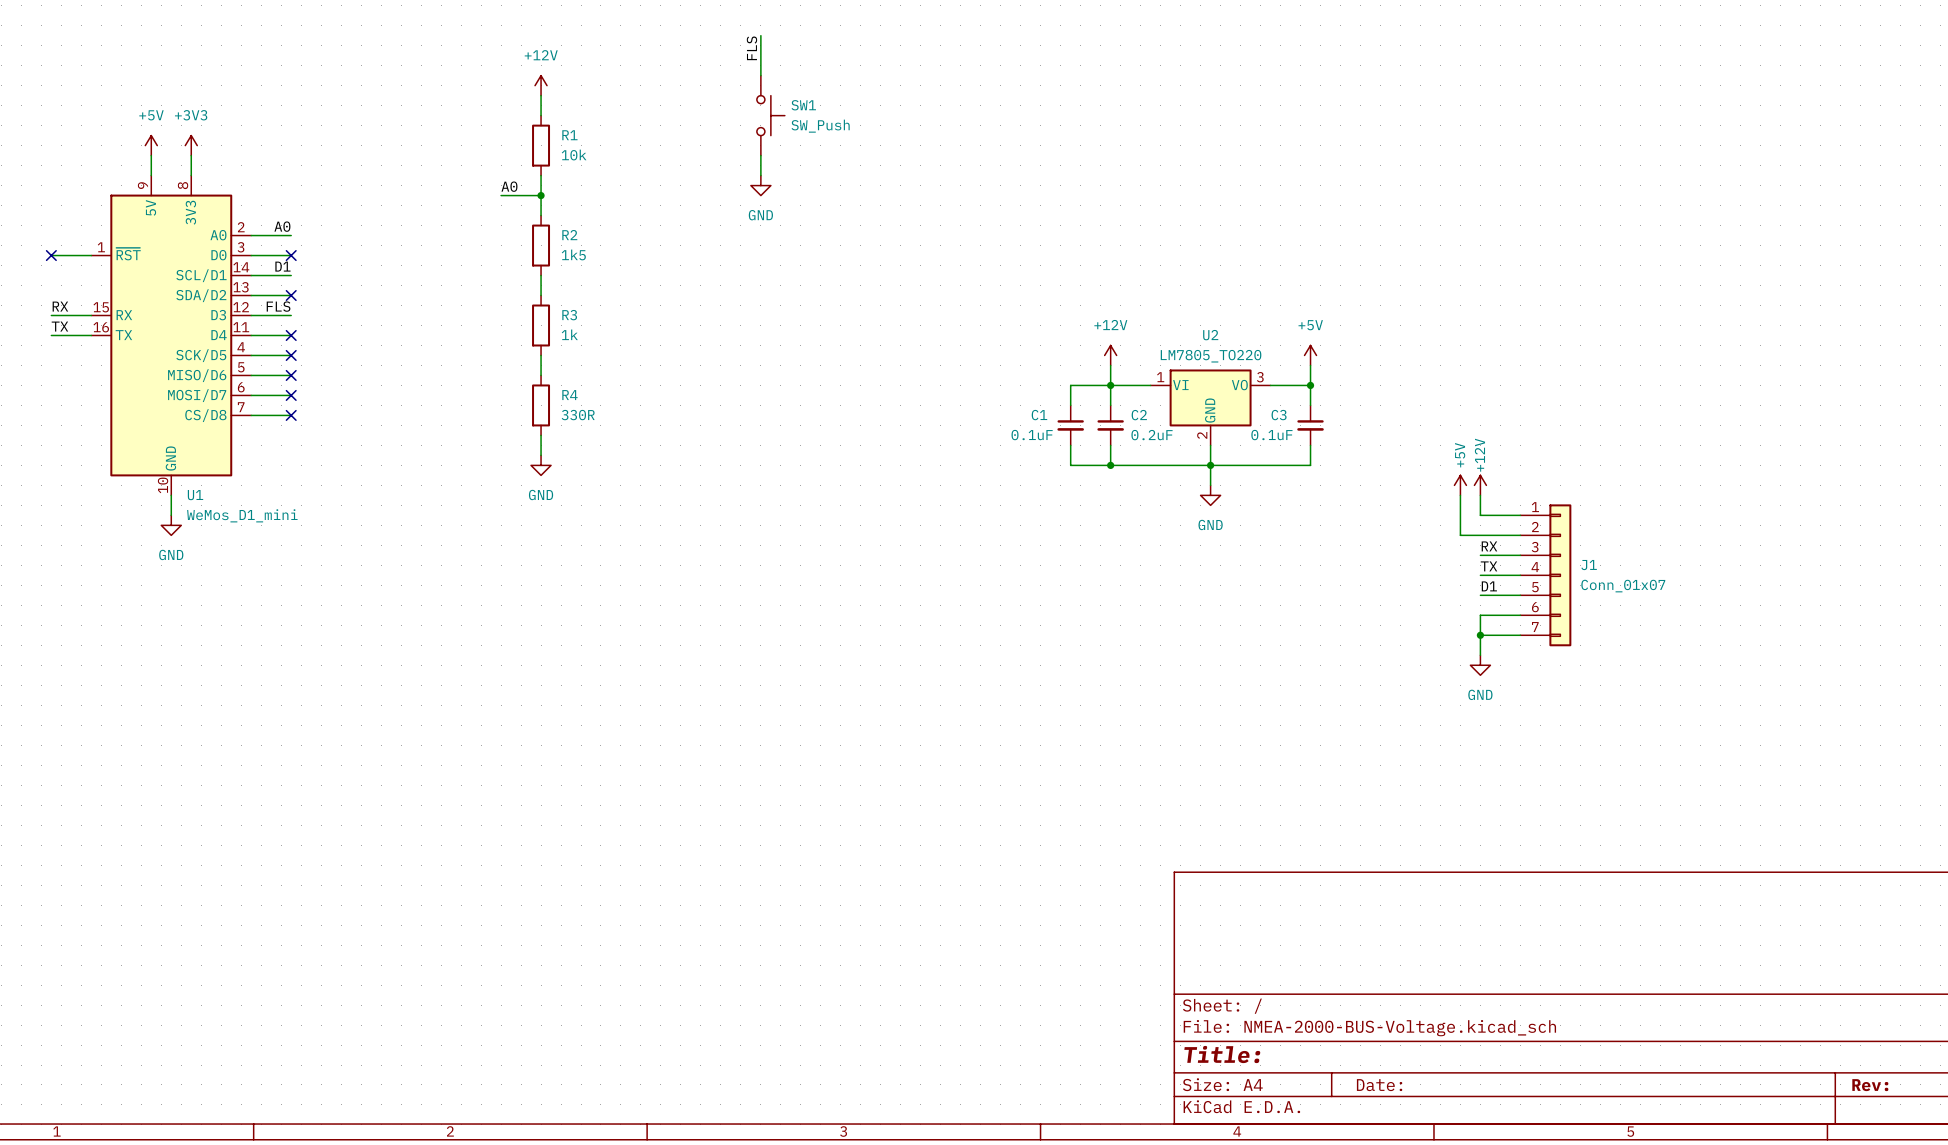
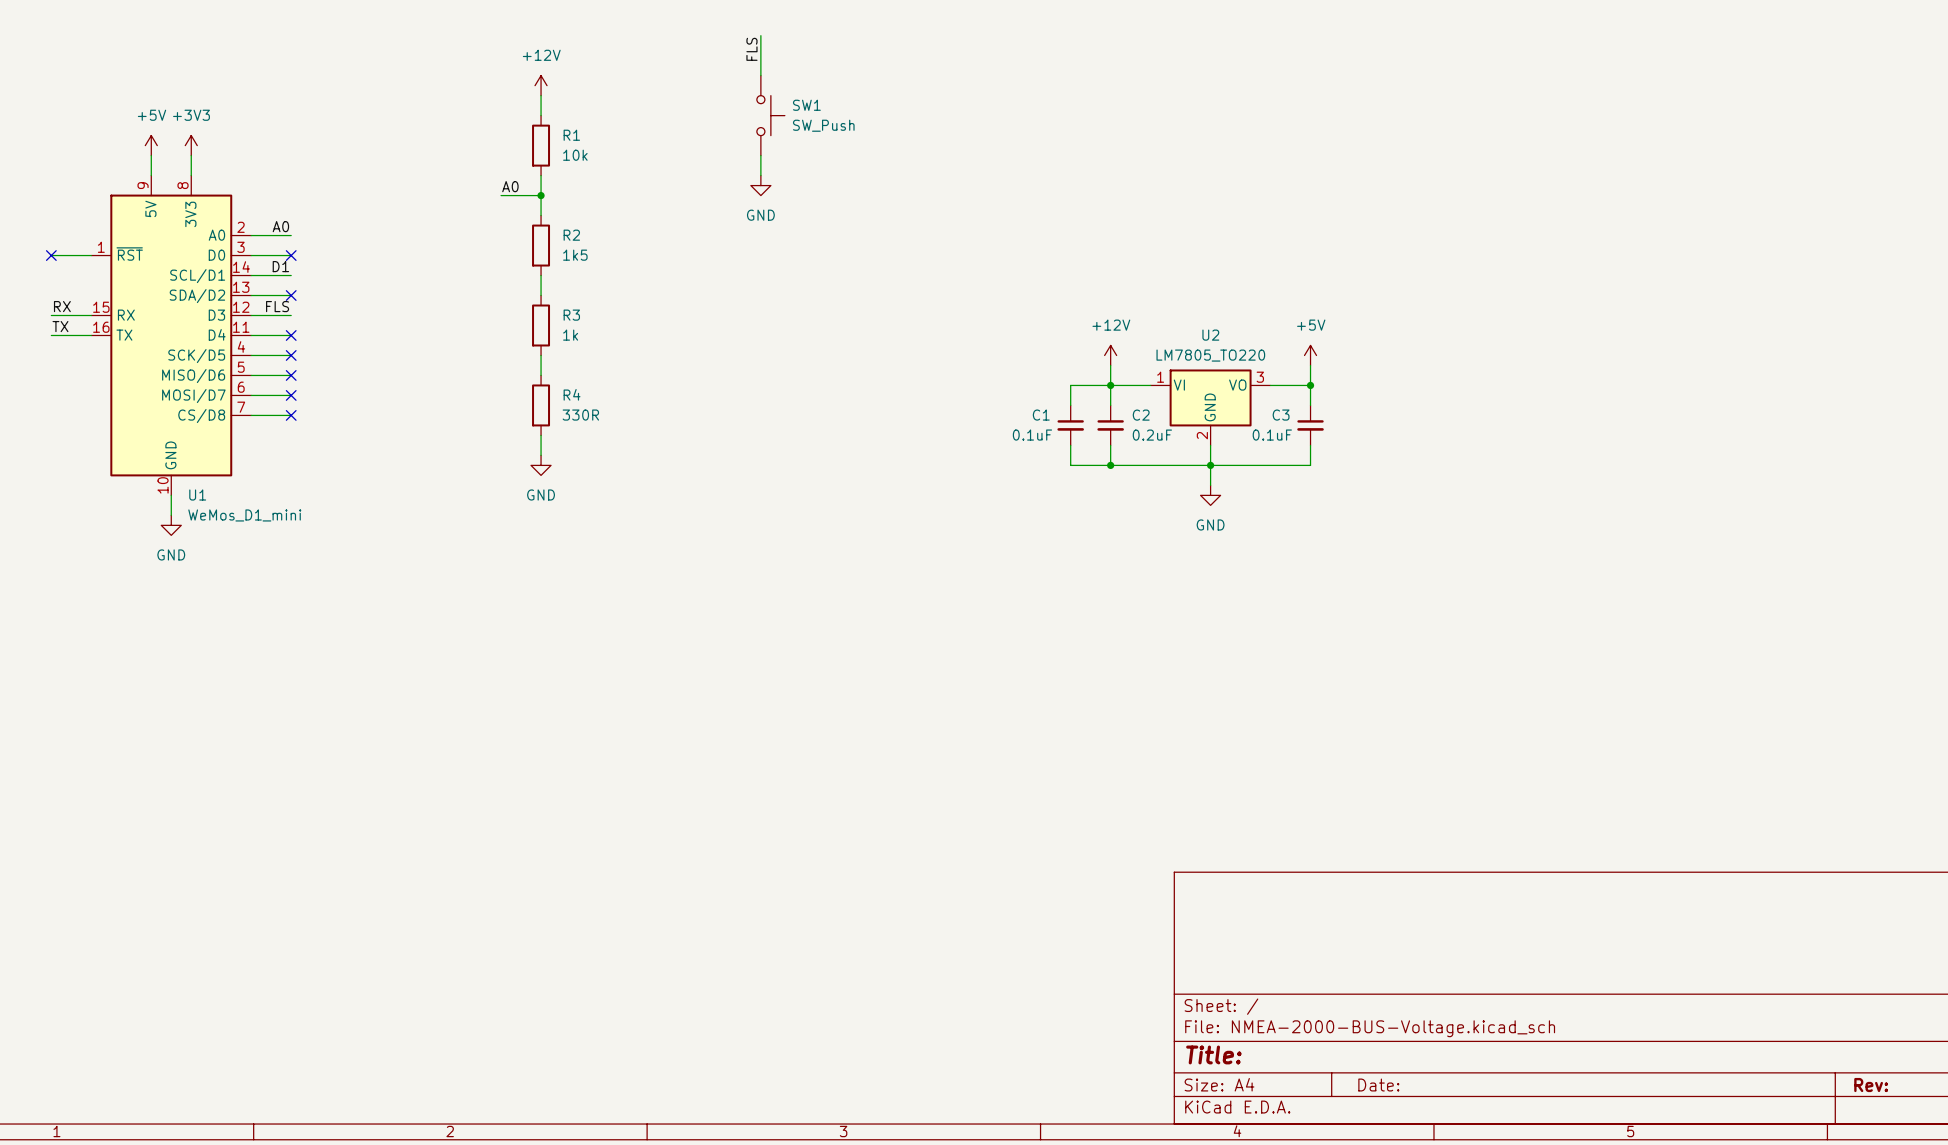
power symbol: +5V (1460, 485) -> none
power symbol: +12V (1480, 485) -> none
wire: (1460, 495) (1460, 535) (1520, 535) -> none
wire: (1480, 495) (1480, 515) (1520, 515) -> none
label: RX (1489, 546) -> none
wire: (1480, 555) (1520, 555) -> none
label: TX (1489, 566) -> none
wire: (1480, 575) (1520, 575) -> none
J1: Conn_01x07 (1545, 575) -> none
label: D1 (1489, 586) -> none
wire: (1480, 595) (1520, 595) -> none
wire: (1520, 615) (1480, 615) (1480, 655) -> none
wire: (1480, 635) (1520, 635) -> none
junction: (1480, 635) -> none
power symbol: GND (1480, 665) -> none

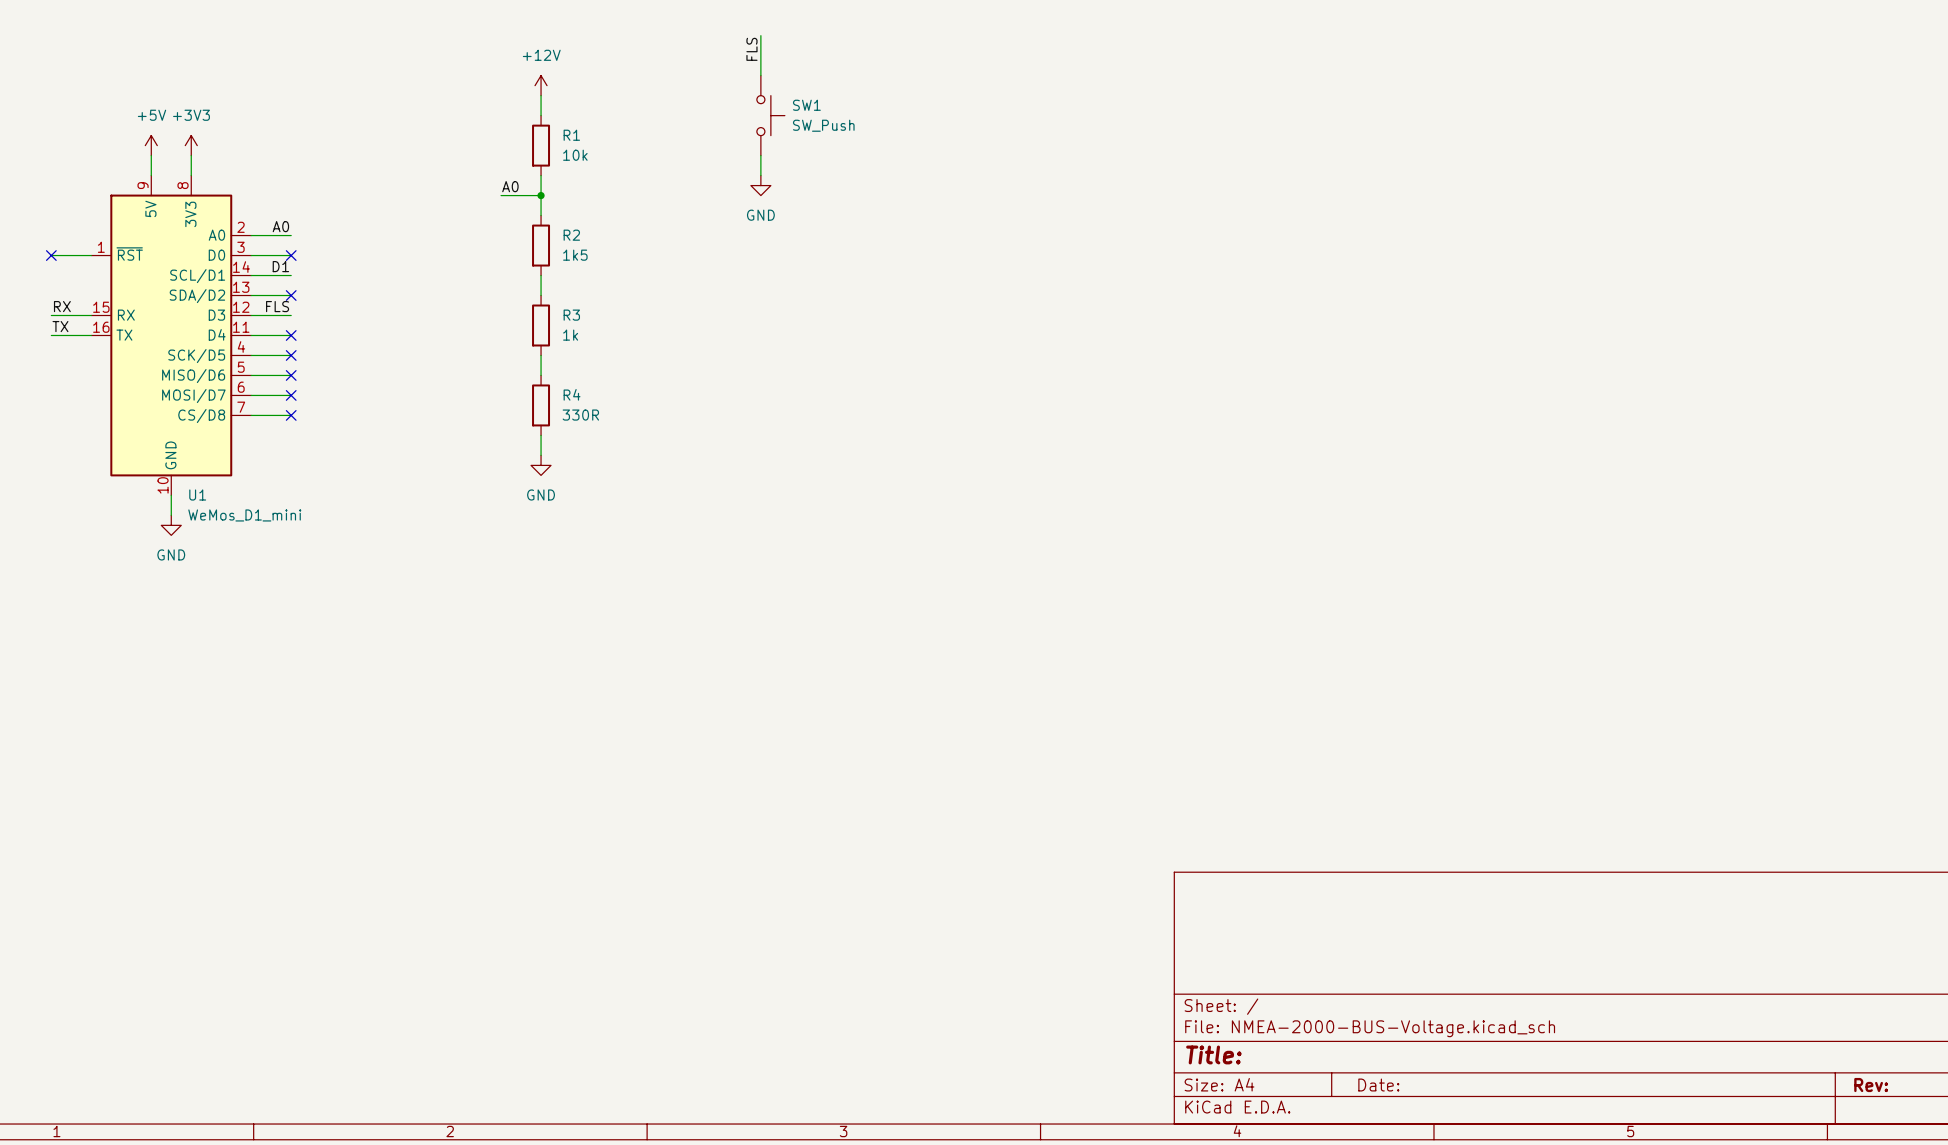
power symbol: +12V (1110, 355) -> none
power symbol: +5V (1310, 355) -> none
wire: (1110, 365) (1110, 405) -> none
wire: (1310, 365) (1310, 405) -> none
junction: (1110, 385) -> none
wire: (1150, 385) (1070, 385) (1070, 405) -> none
wire: (1270, 385) (1310, 385) -> none
junction: (1310, 385) -> none
U2: LM7805_TO220 (1210, 407) -> none
C1: 0.1uF (1070, 425) -> none
C2: 0.2uF (1110, 425) -> none
C3: 0.1uF (1310, 425) -> none
wire: (1070, 445) (1070, 465) (1310, 465) (1310, 445) -> none
wire: (1110, 445) (1110, 465) -> none
wire: (1210, 445) (1210, 485) -> none
junction: (1110, 465) -> none
junction: (1210, 465) -> none
power symbol: GND (1210, 495) -> none

